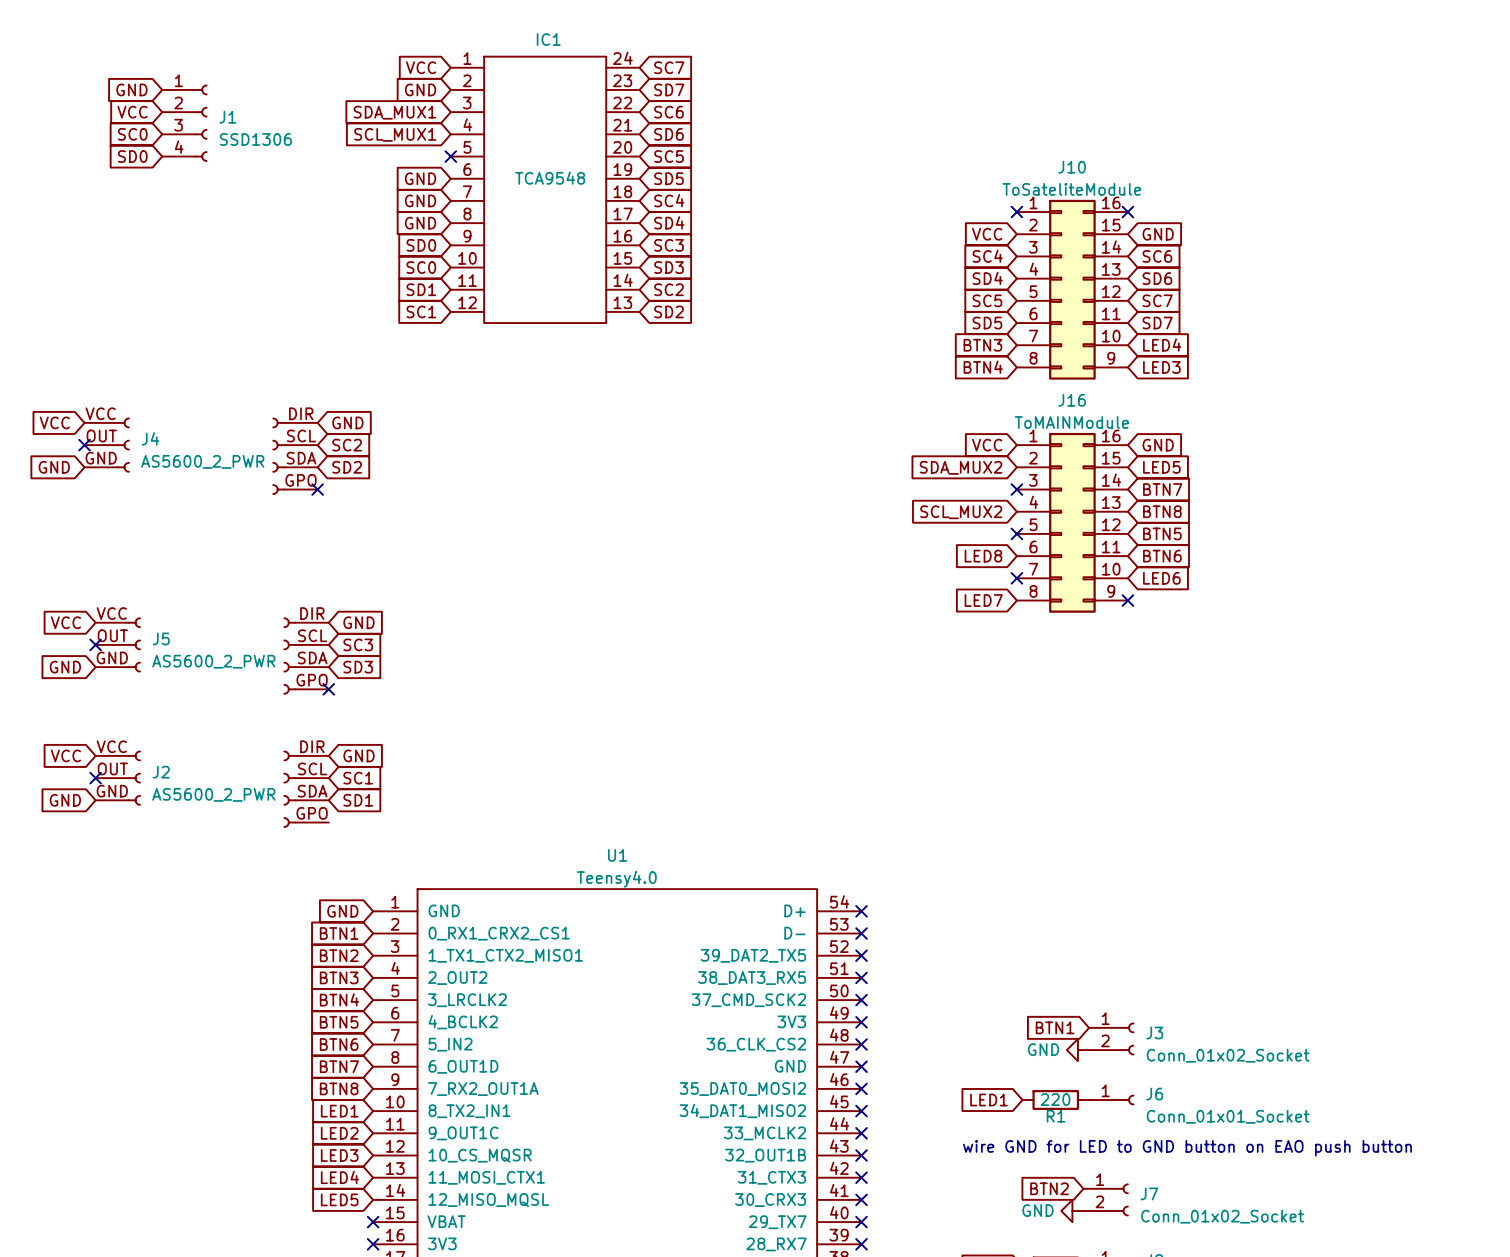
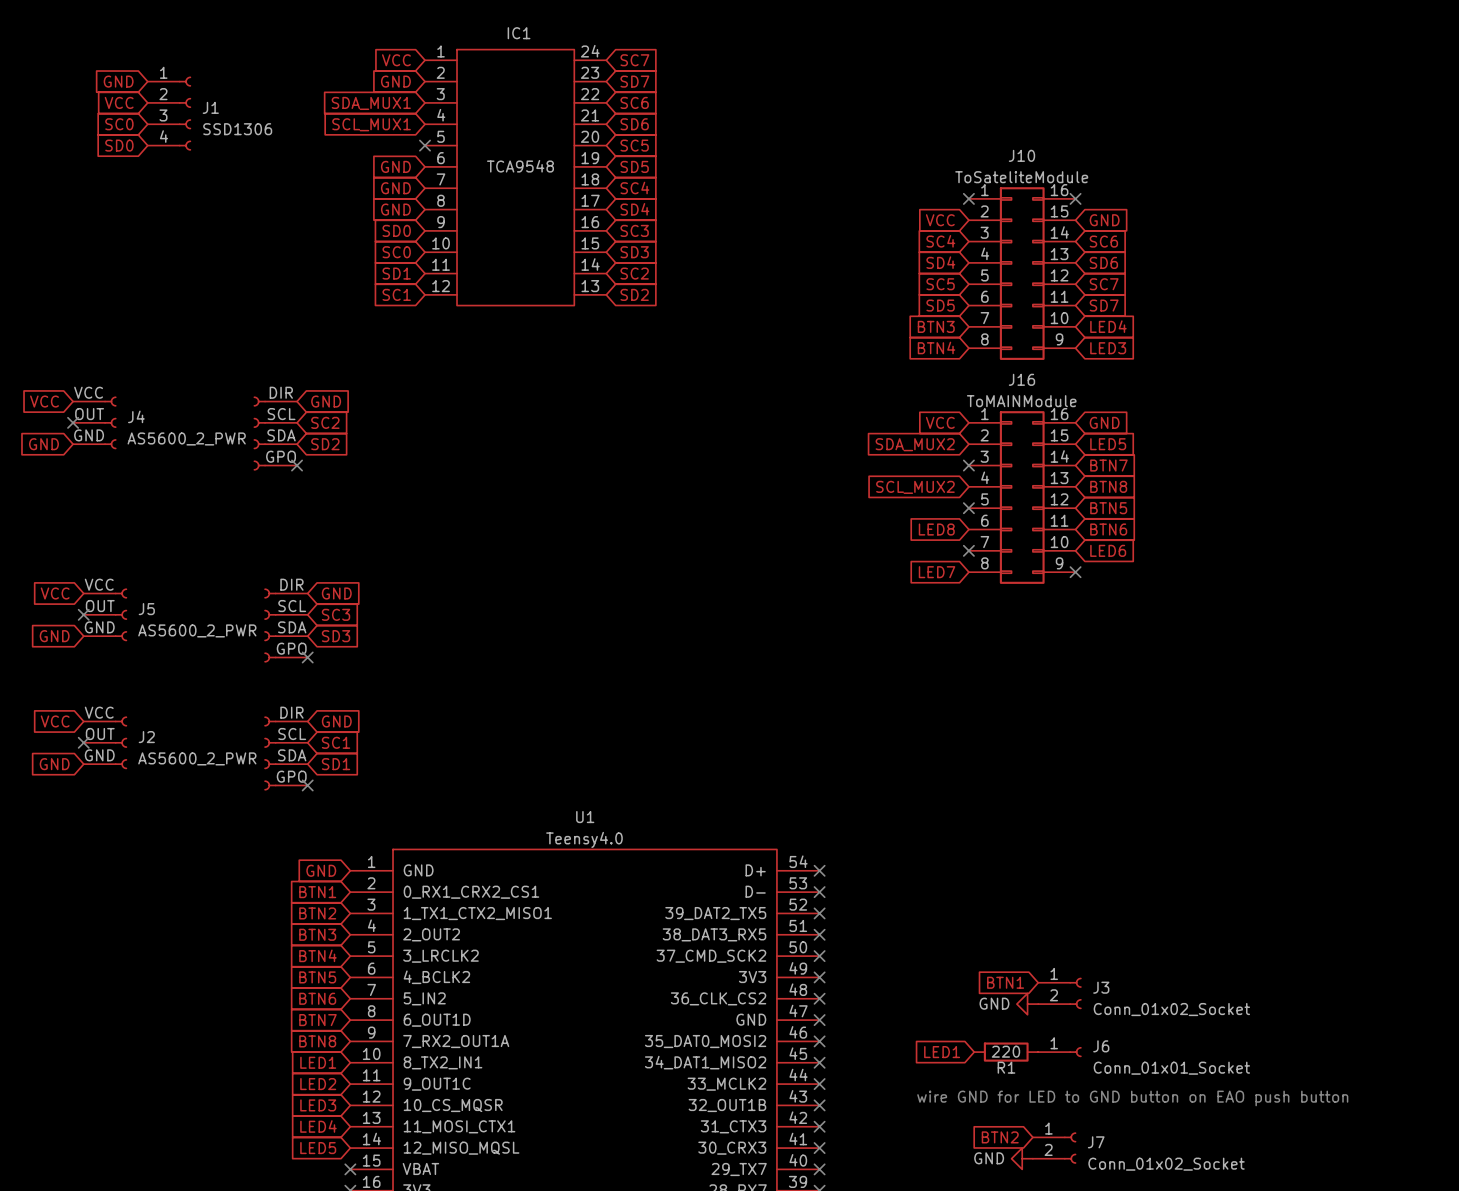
no-connect mark: none -> (307, 785)

